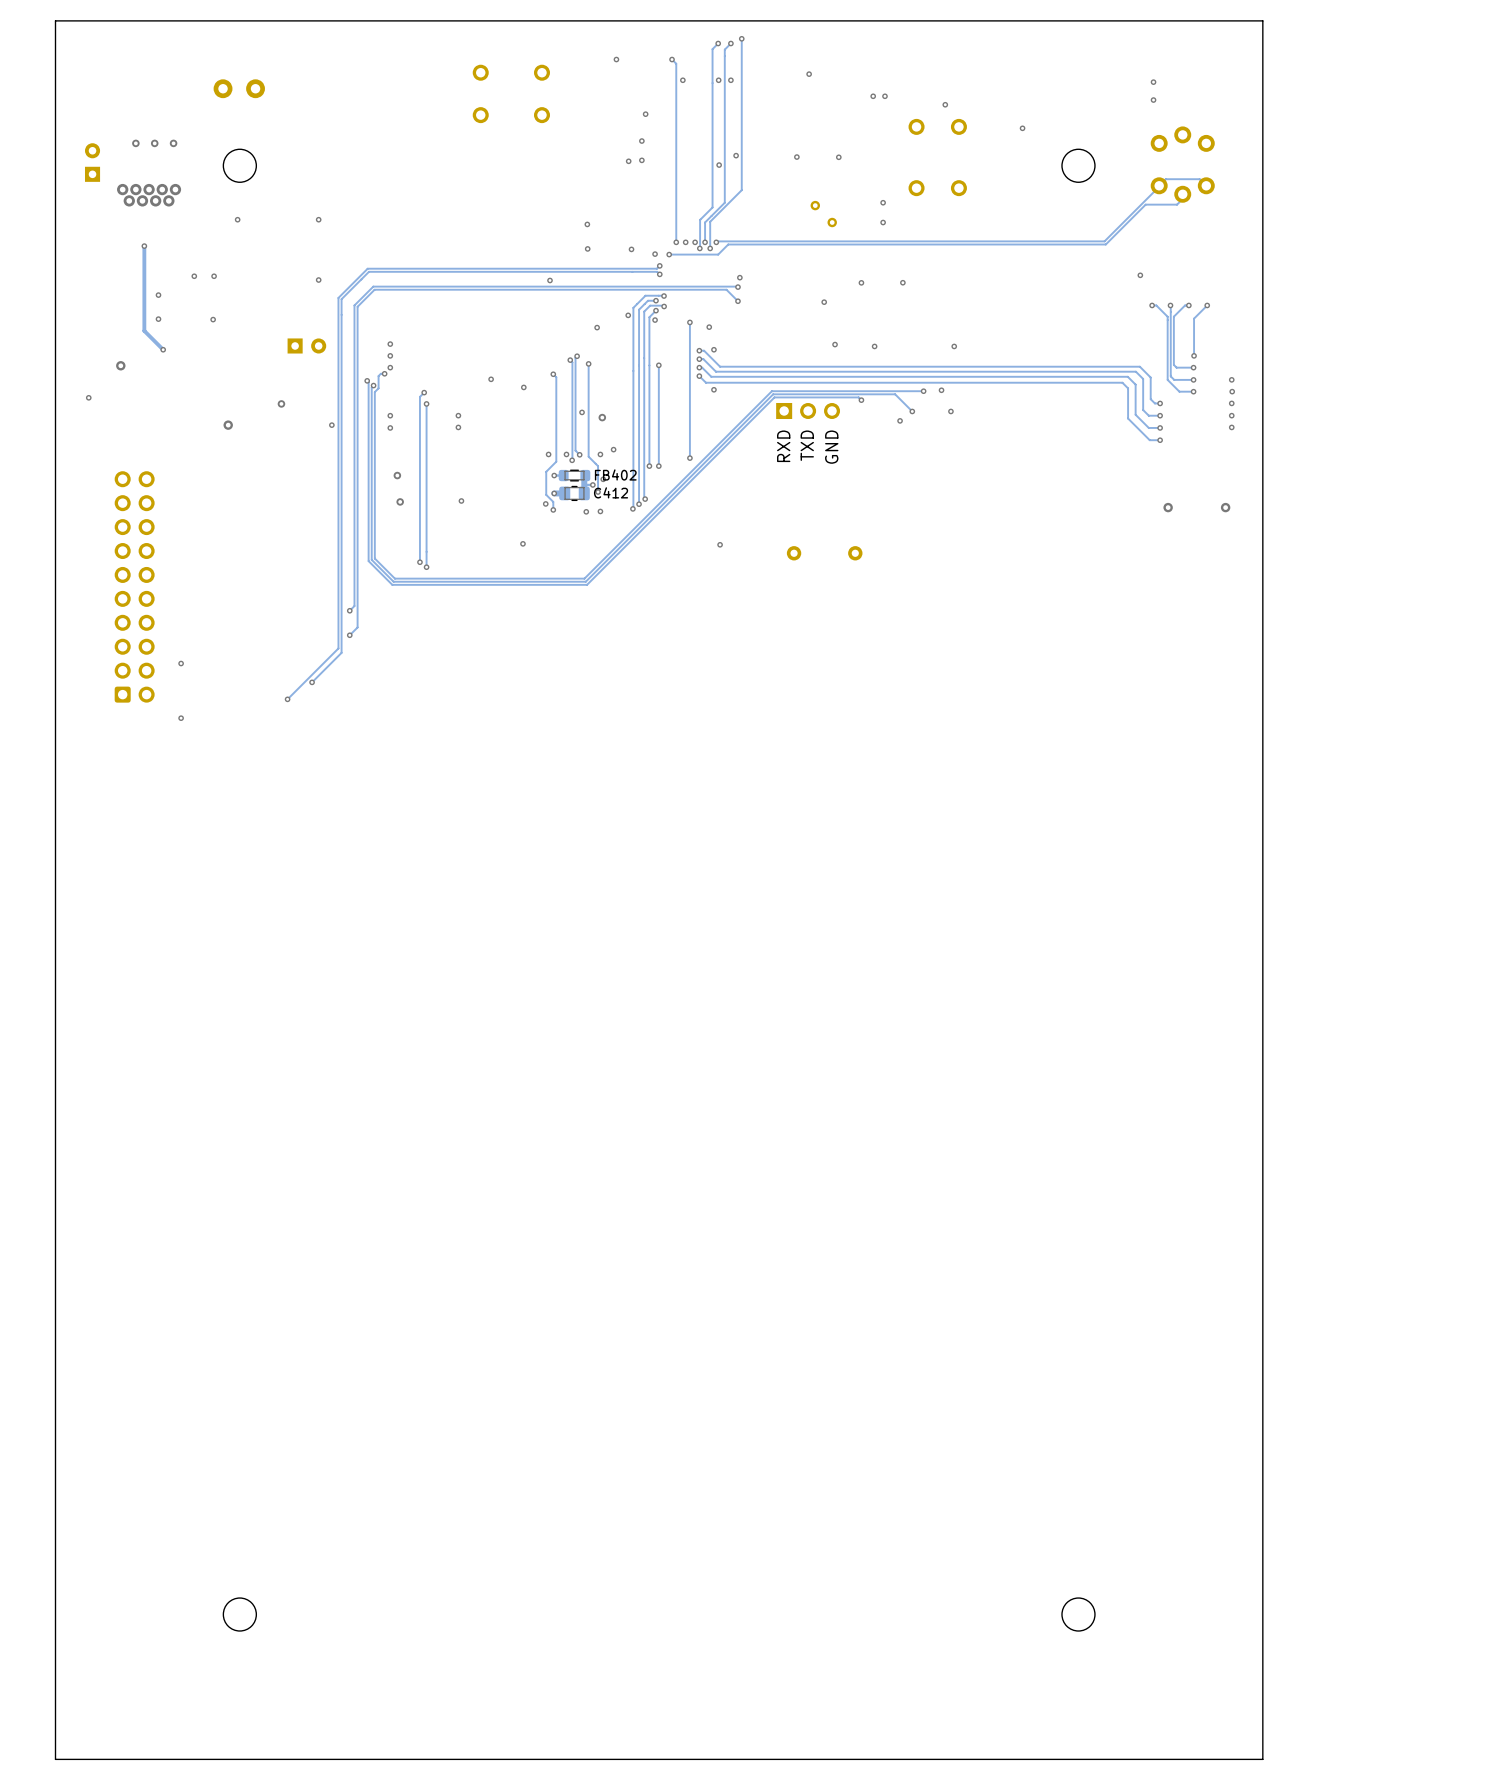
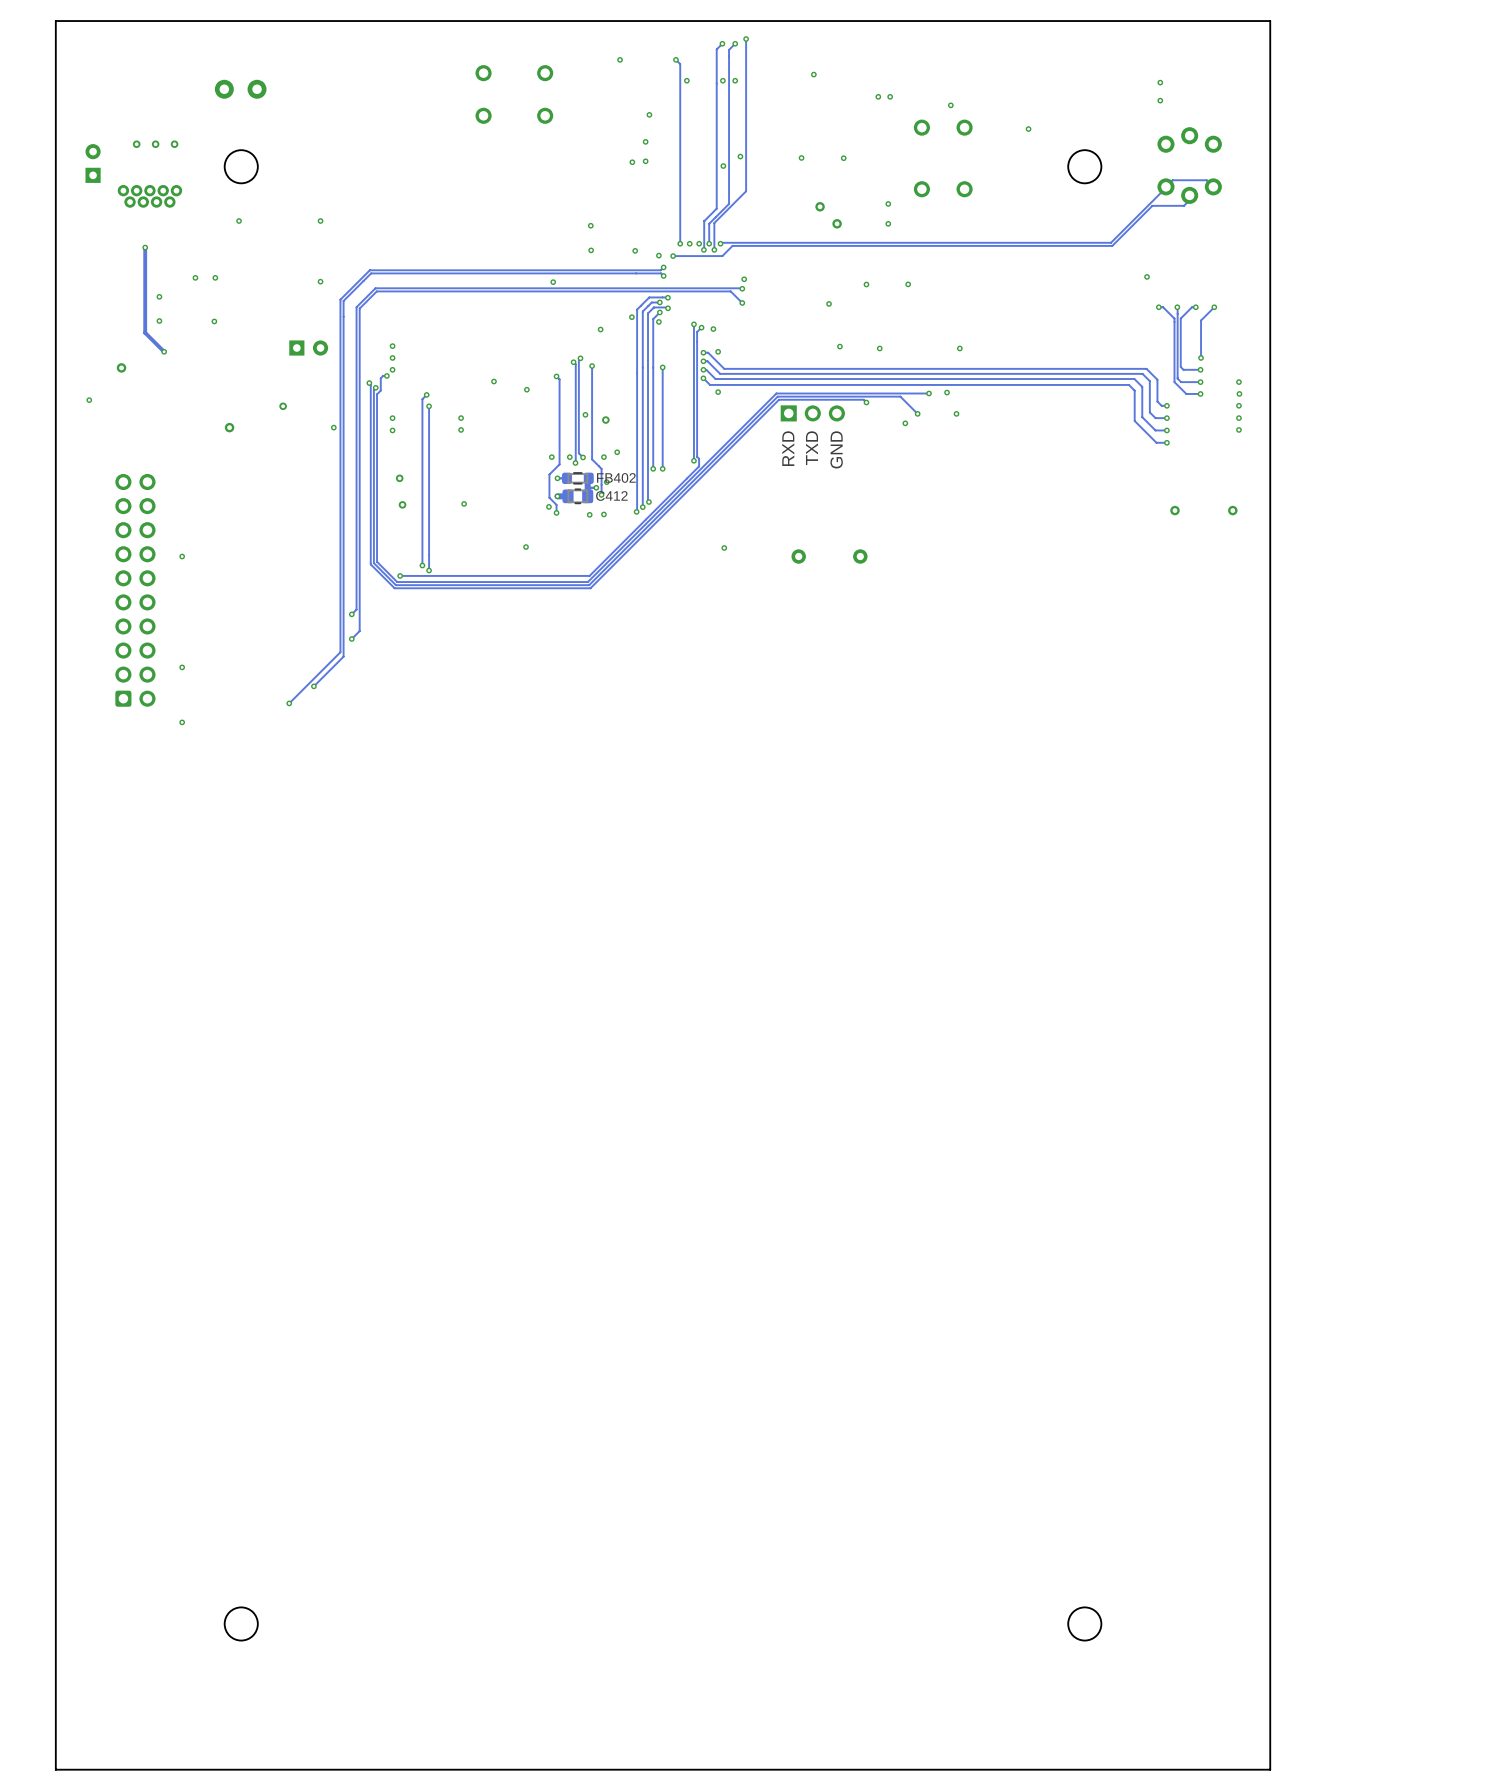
track: none -> (701, 327) (697, 332) (697, 456) (699, 458) (699, 466) (589, 575) (400, 575)
via: none -> (701, 327)
via: none -> (182, 556)
via: none -> (400, 575)

